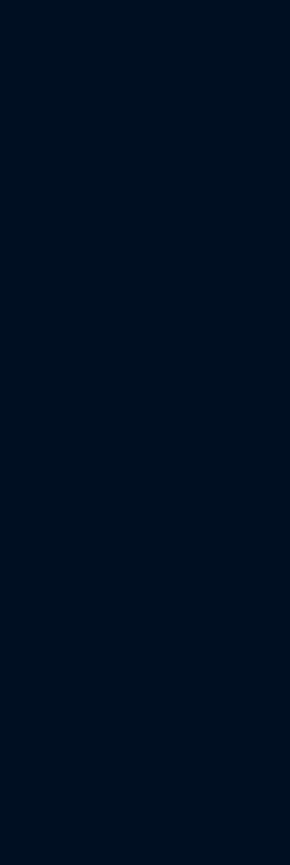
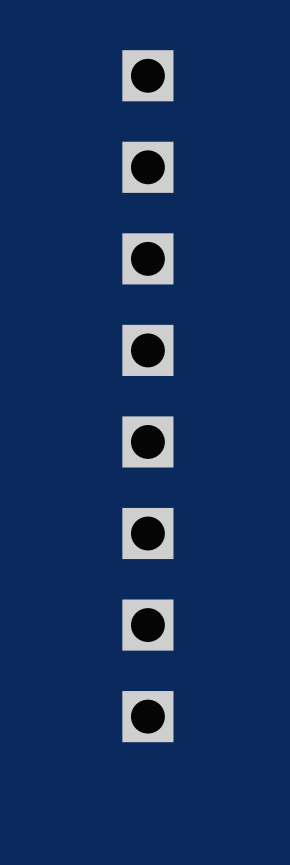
part: none -> (147, 75)
part: none -> (147, 167)
part: none -> (147, 258)
part: none -> (147, 350)
part: none -> (147, 441)
part: none -> (147, 533)
part: none -> (147, 625)
part: none -> (147, 716)

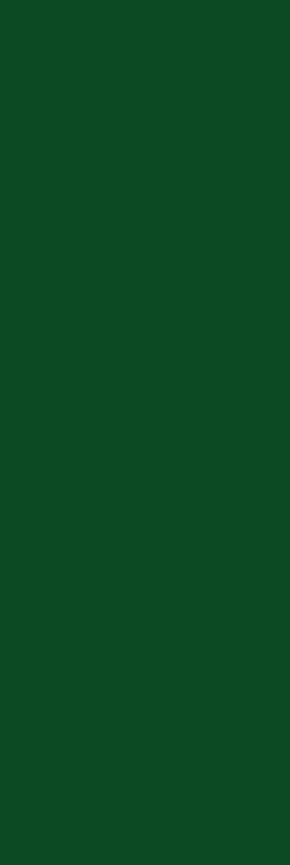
part: (147, 75) -> none
part: (147, 167) -> none
part: (147, 258) -> none
part: (147, 350) -> none
part: (147, 441) -> none
part: (147, 533) -> none
part: (147, 625) -> none
part: (147, 716) -> none

